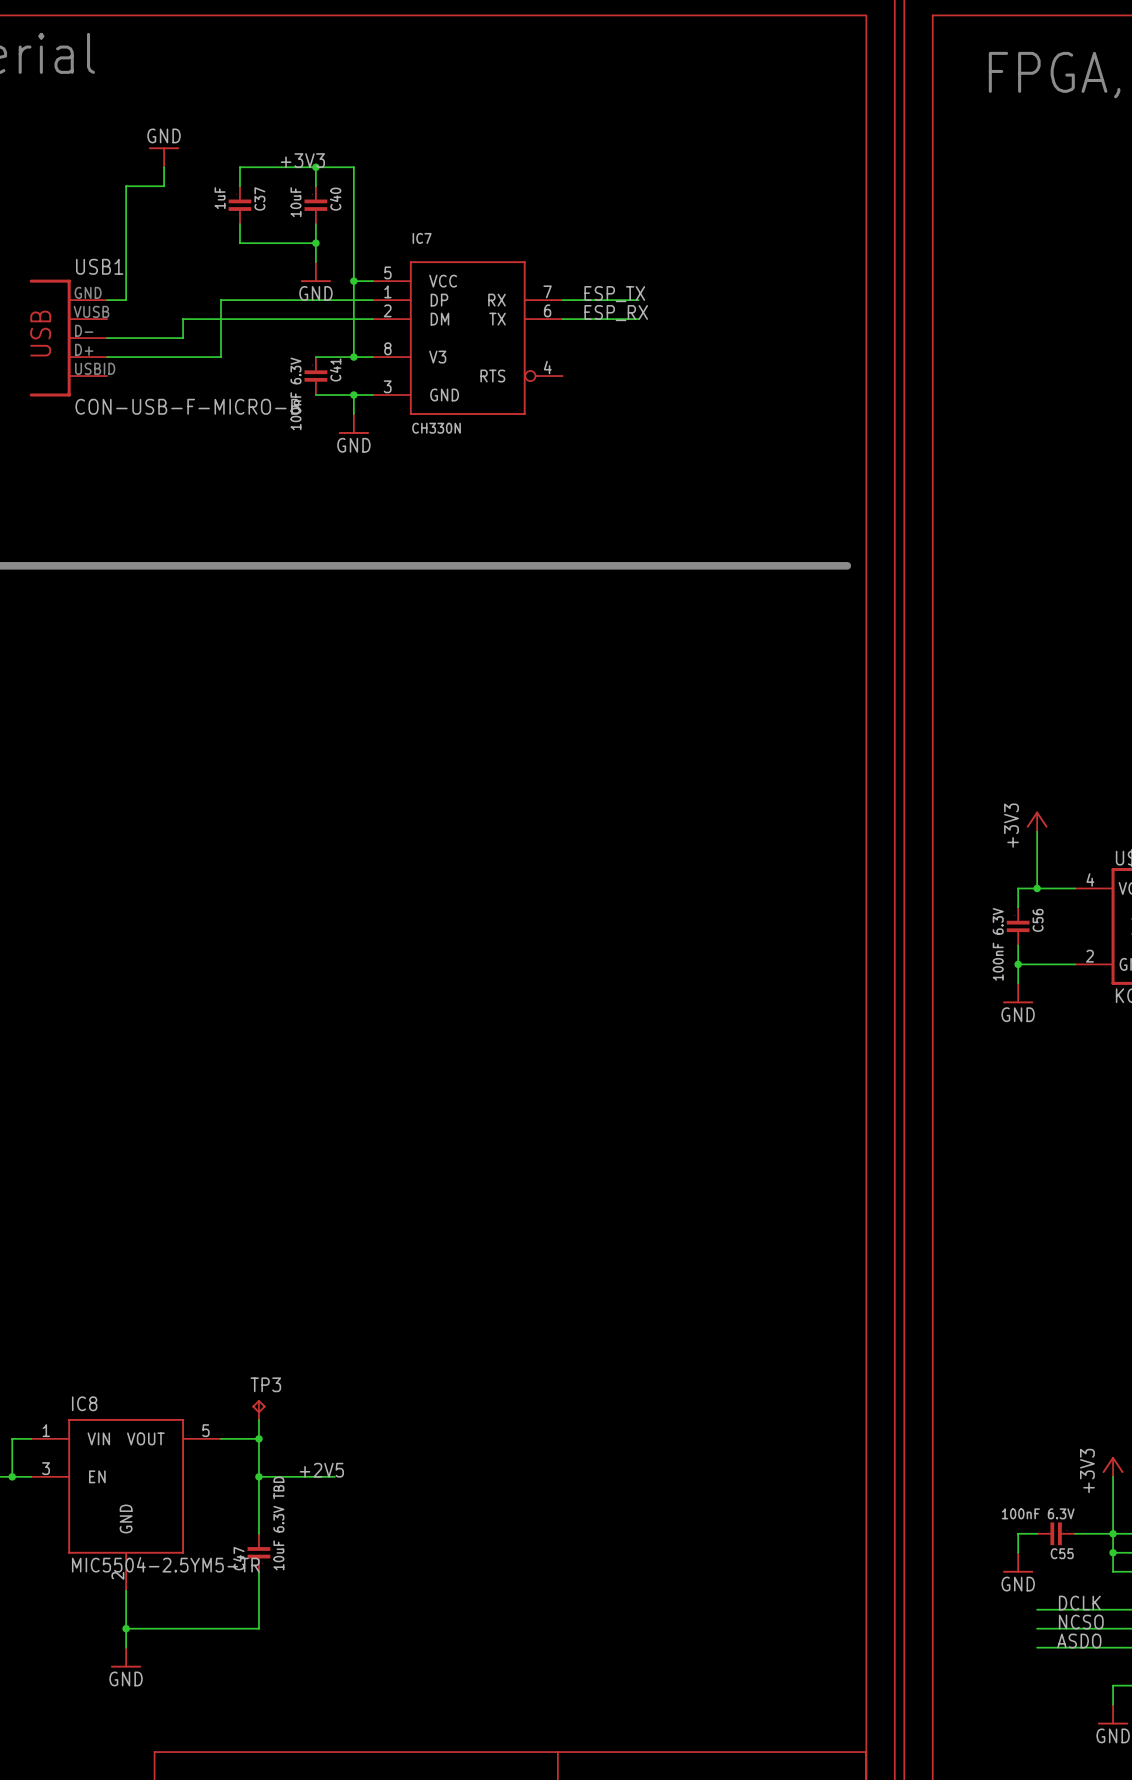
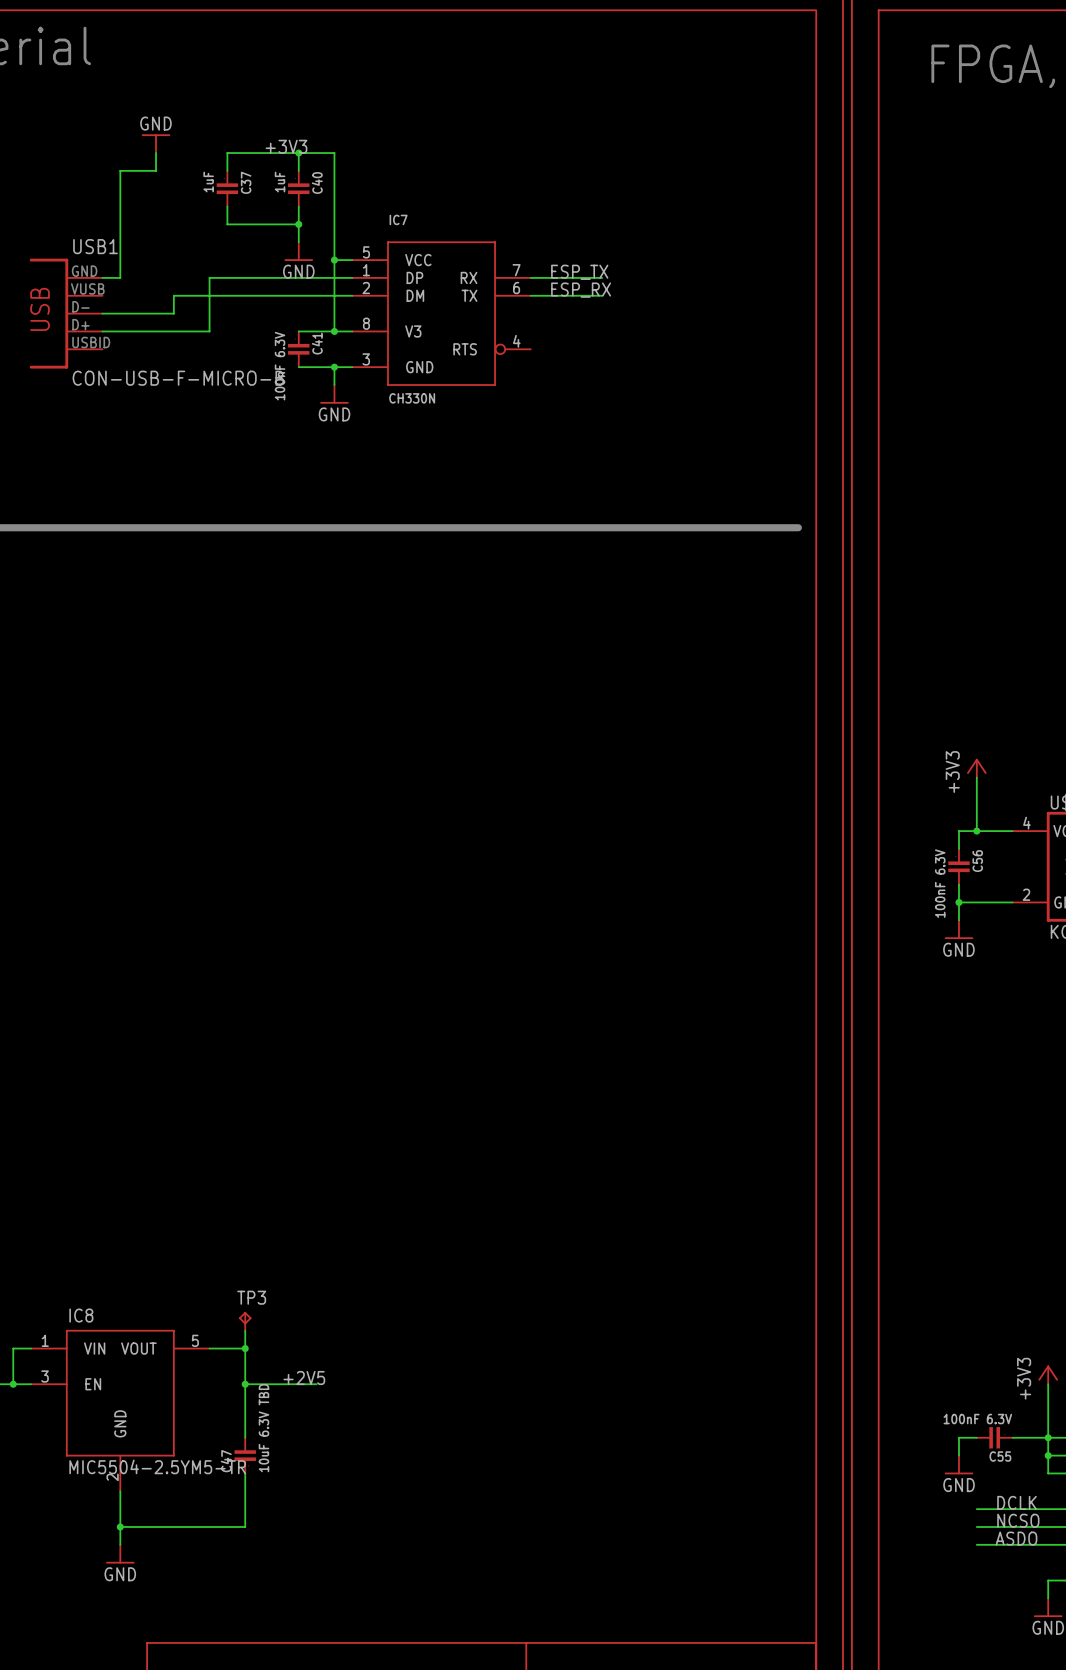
C40 value: 10uF (295, 202) -> 1uF (280, 182)

